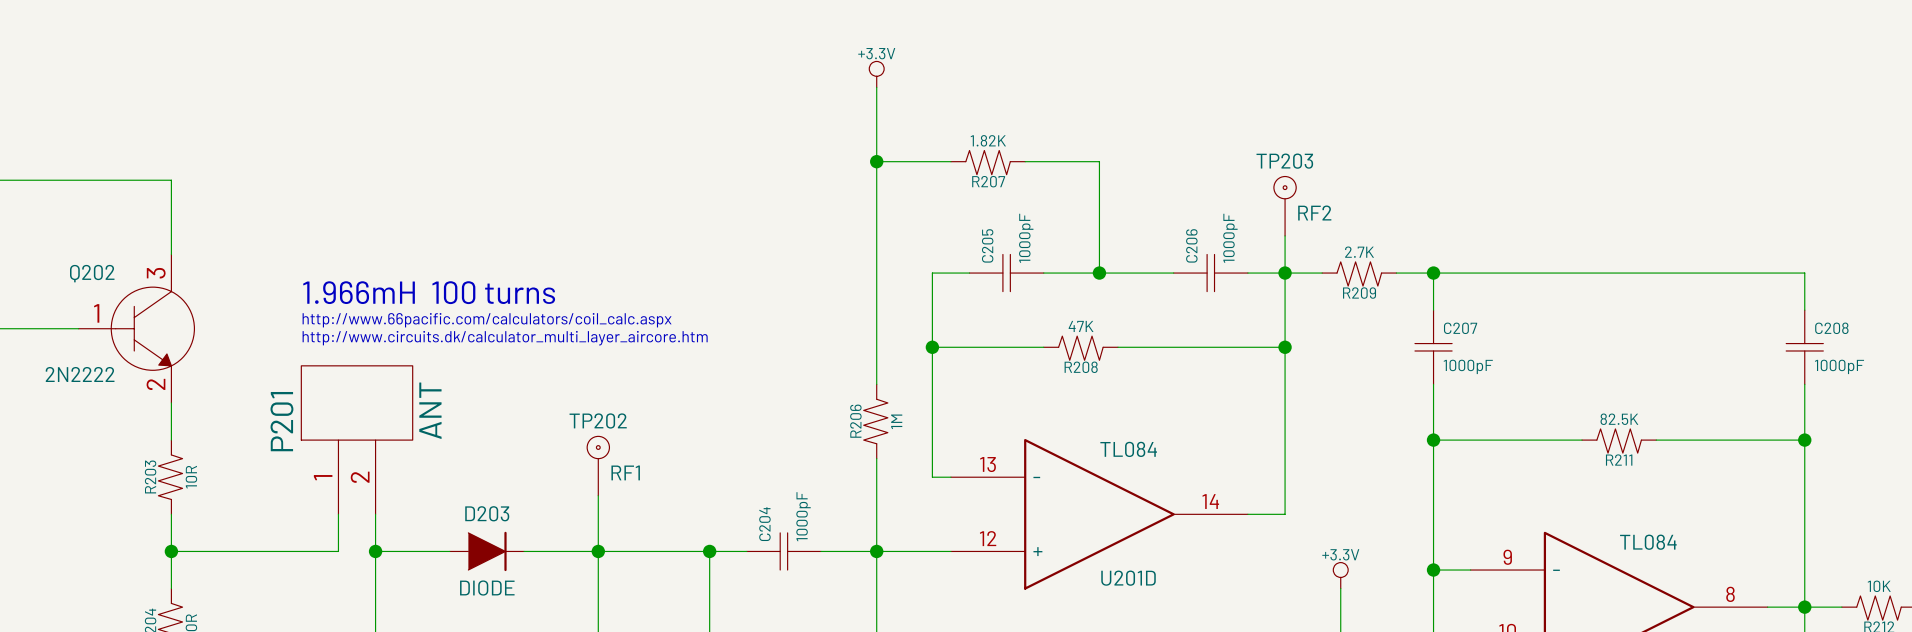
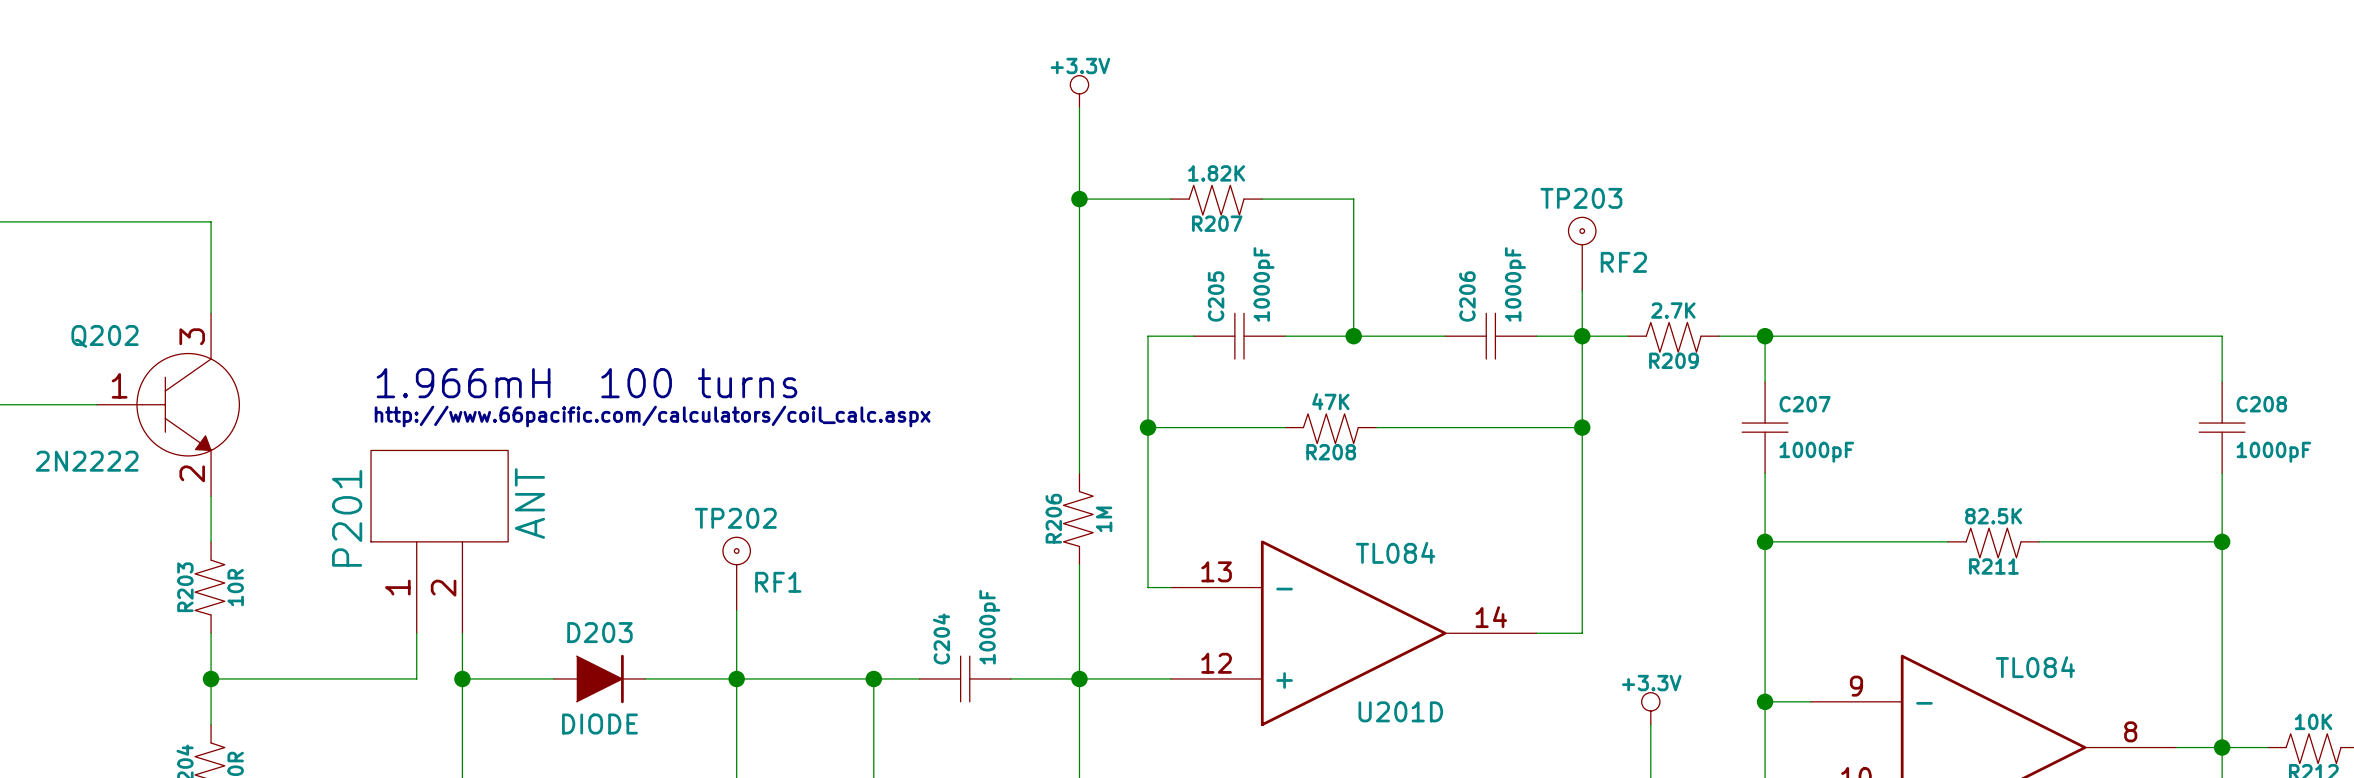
text: 1.966mH 100 turns (429, 292) -> none
text: http://www.66pacific.com/calculators/coil_calc.aspx (487, 320) -> 1.966mH 100 turns (586, 383)
text: http://www.circuits.dk/calculator_multi_layer_aircore.htm (505, 338) -> http://www.66pacific.com/calculators/coil_calc.aspx (652, 416)

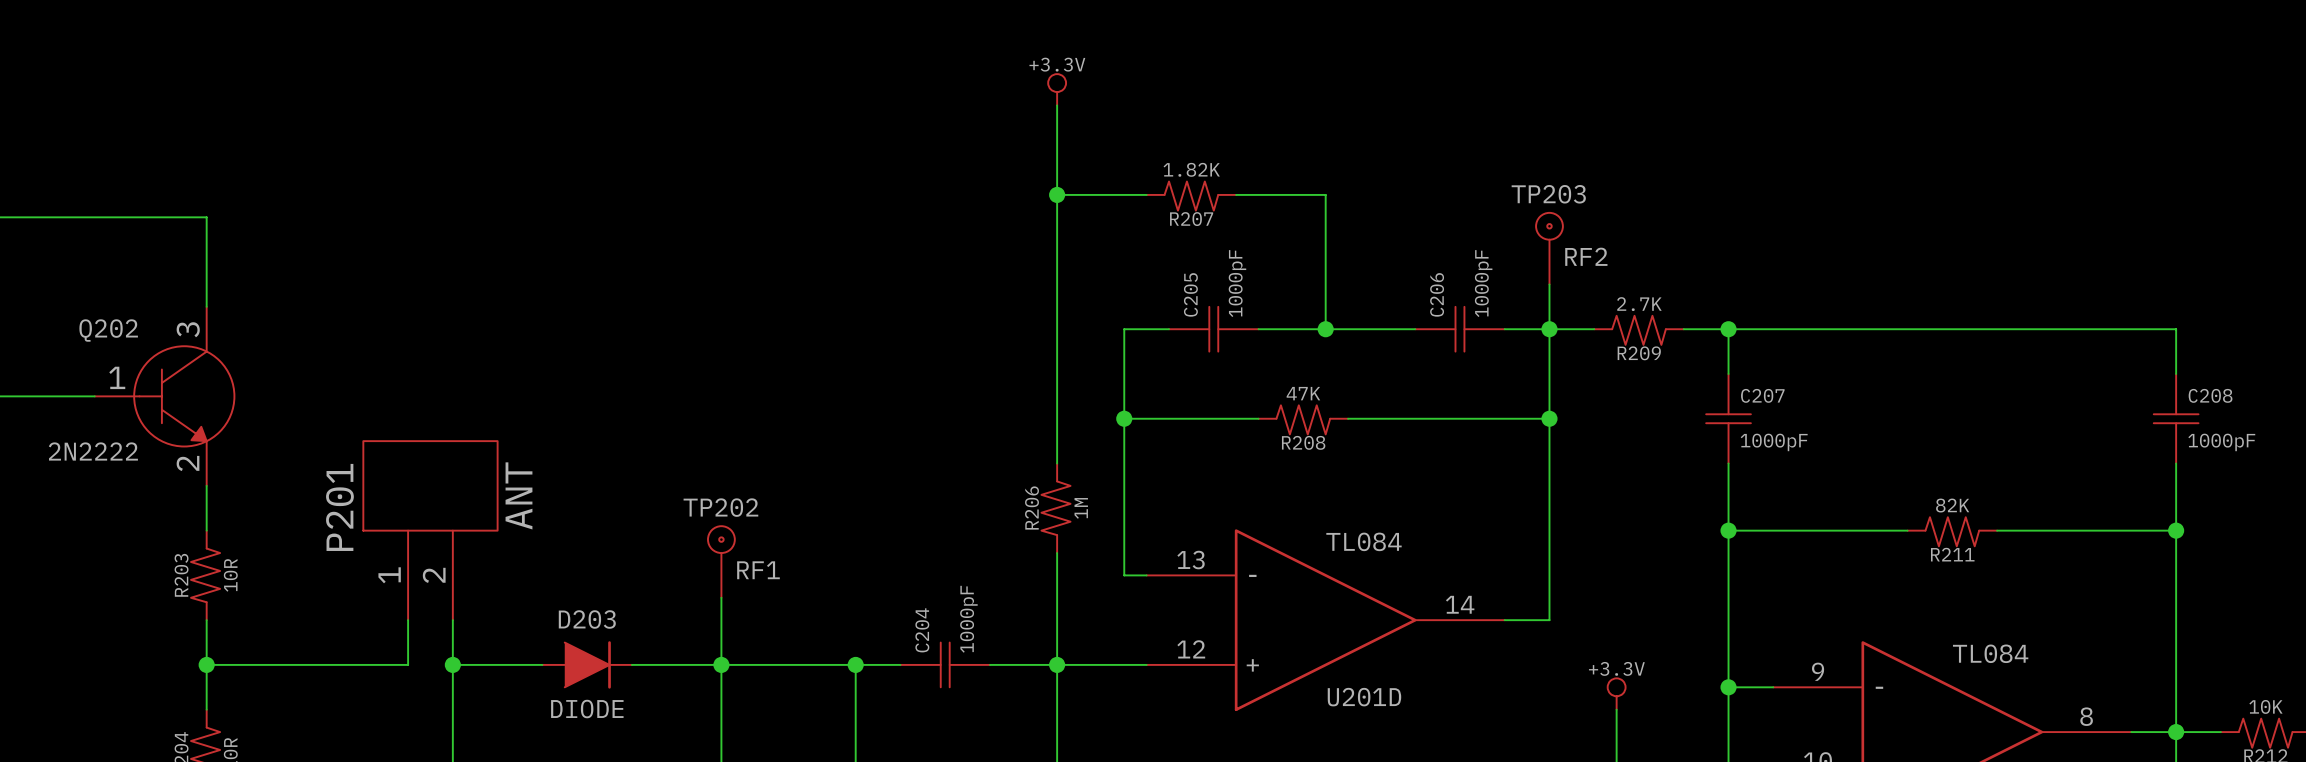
text: 1.966mH 100 turns (586, 383) -> none
text: http://www.66pacific.com/calculators/coil_calc.aspx (652, 416) -> none
R211 value: 82.5K (1993, 516) -> 82K (1952, 505)

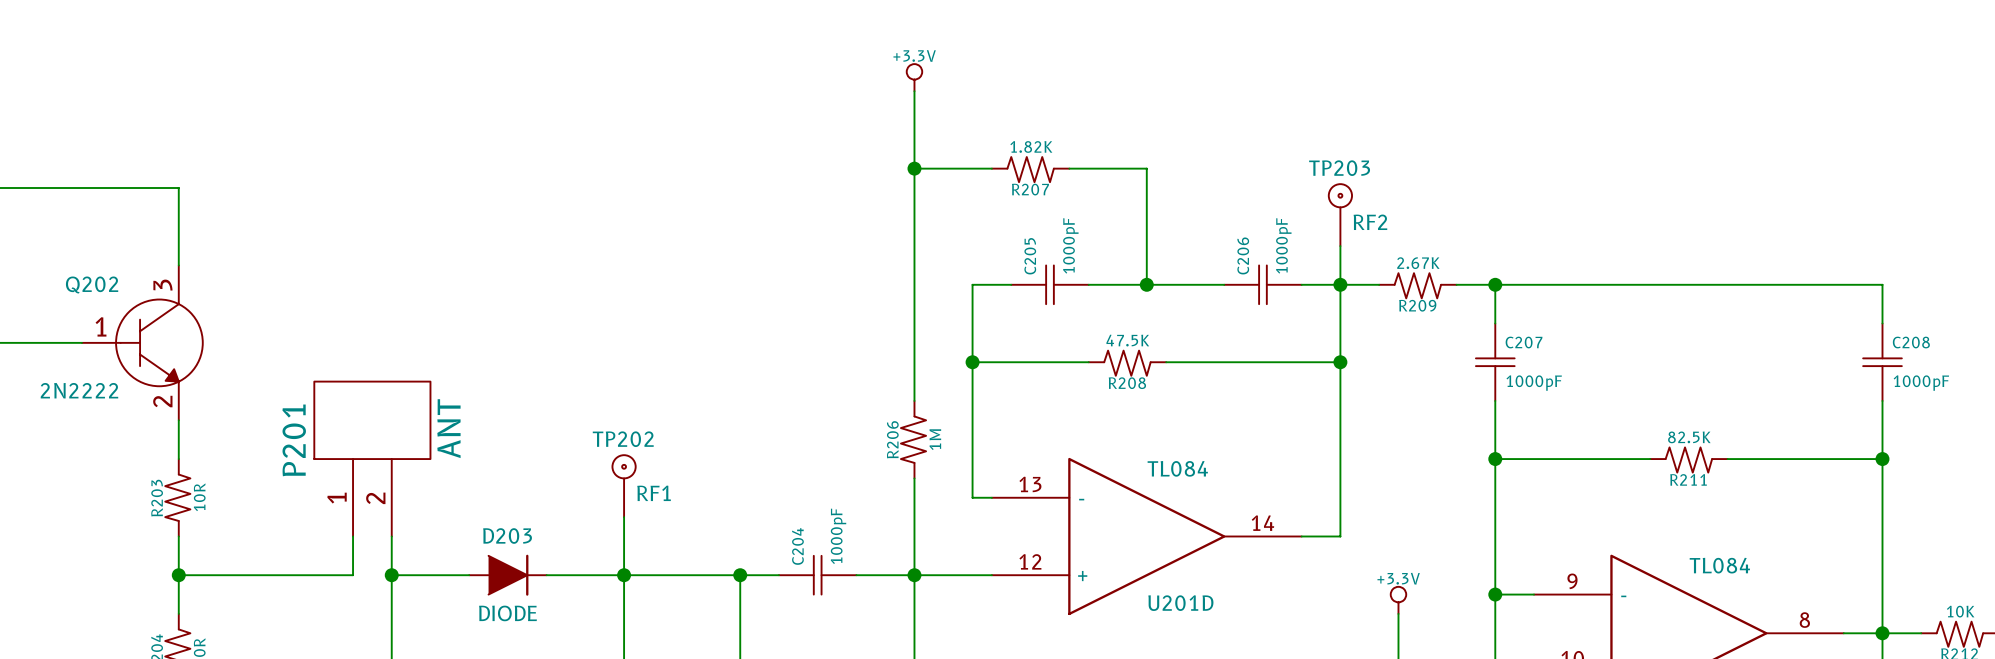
R209 value: 2.7K (1639, 304) -> 2.67K (1418, 263)
R208 value: 47K (1303, 393) -> 47.5K (1127, 340)
R211 value: 82K (1952, 505) -> 82.5K (1689, 437)

